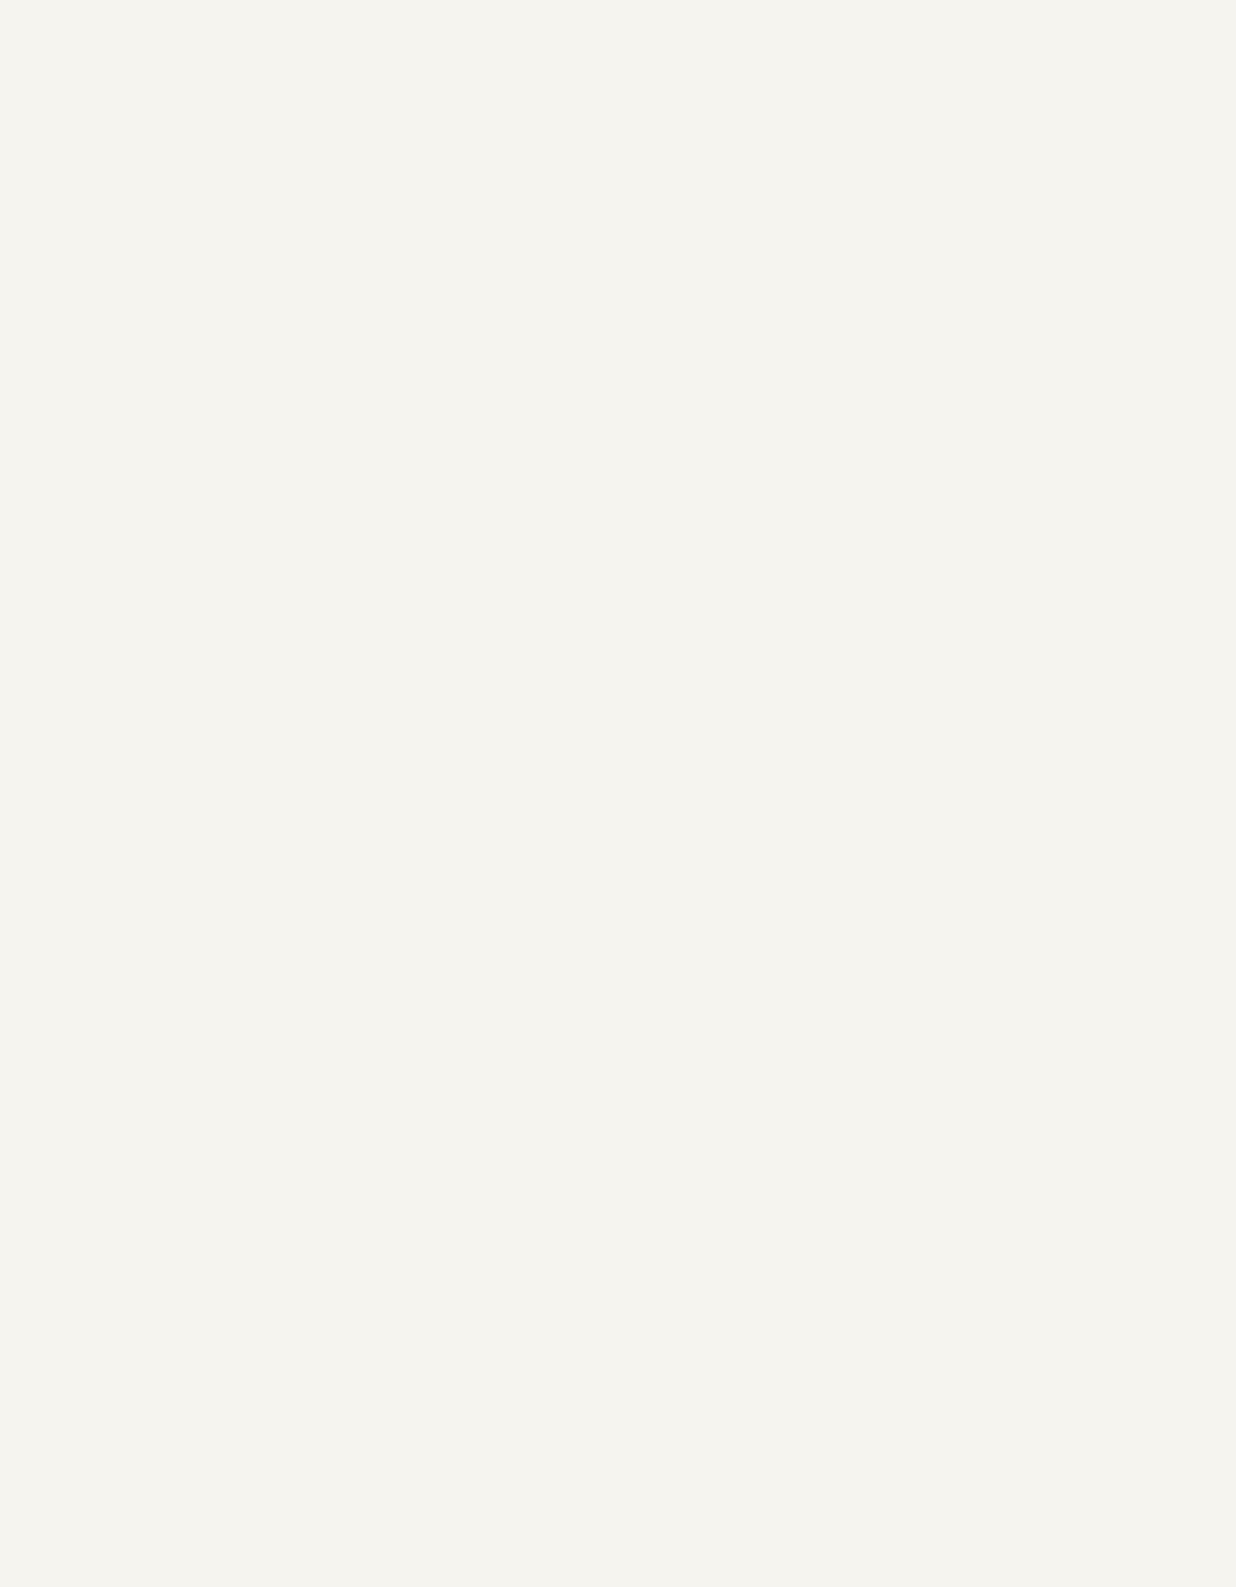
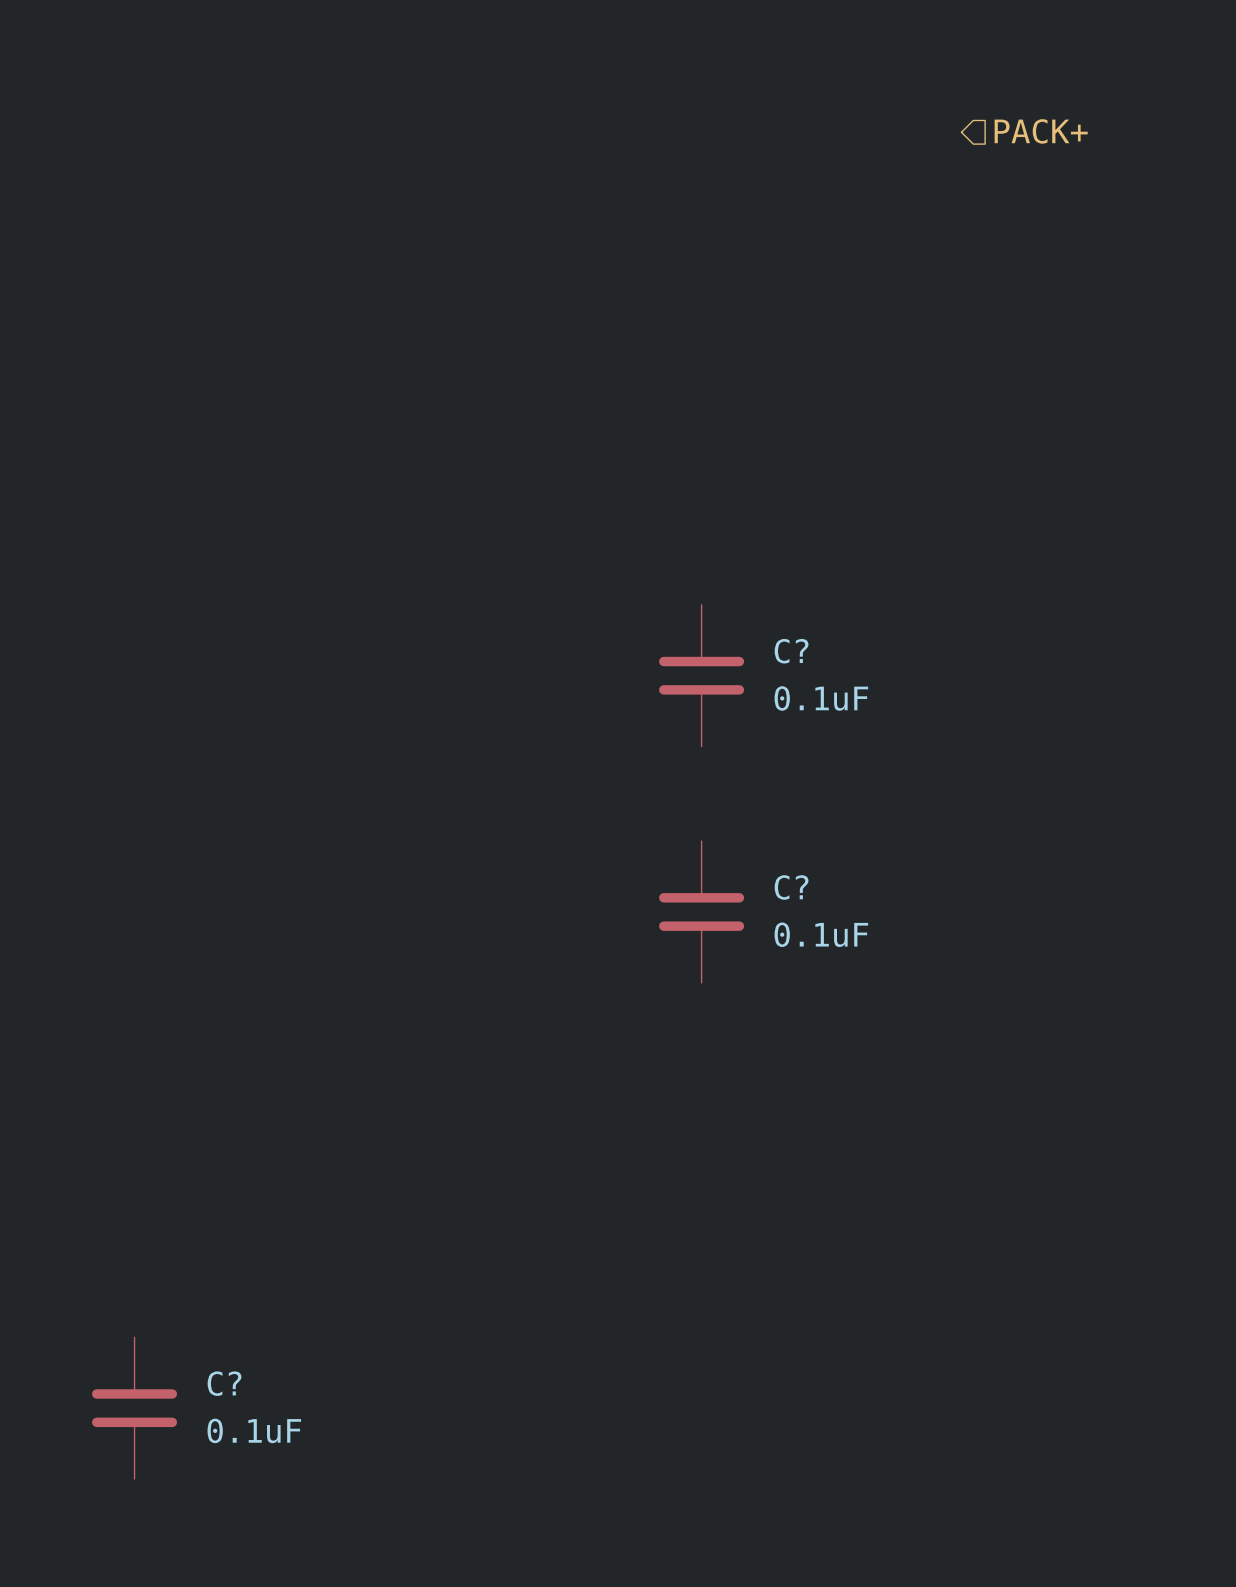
hierarchical label: none -> PACK+ (1041, 131)
C?: none -> 0.1uF (701, 675)
C?: none -> 0.1uF (701, 911)
C?: none -> 0.1uF (134, 1408)

